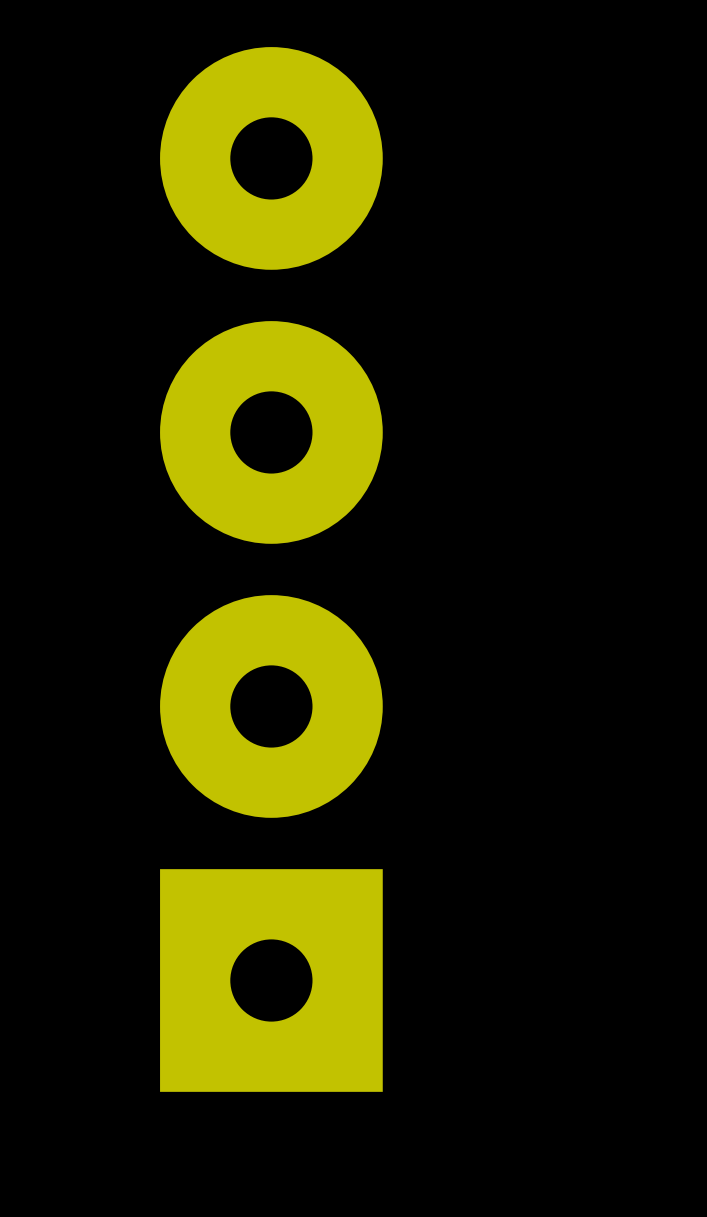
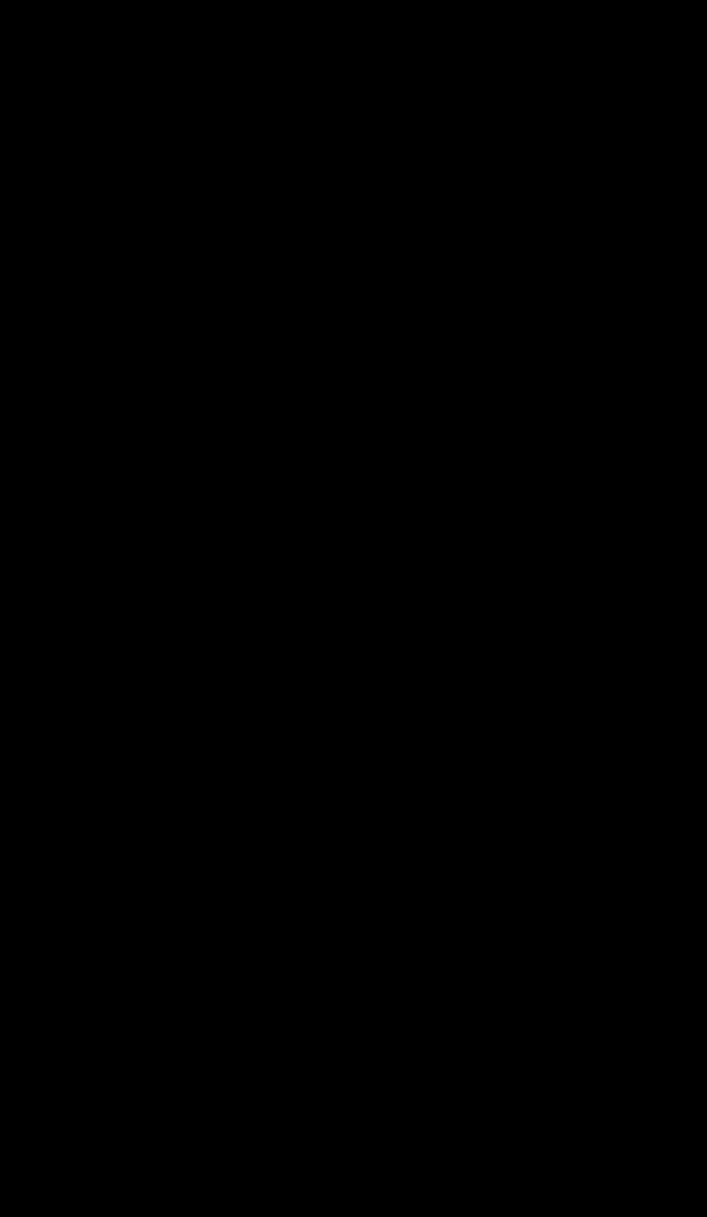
part: (271, 569) -> none

